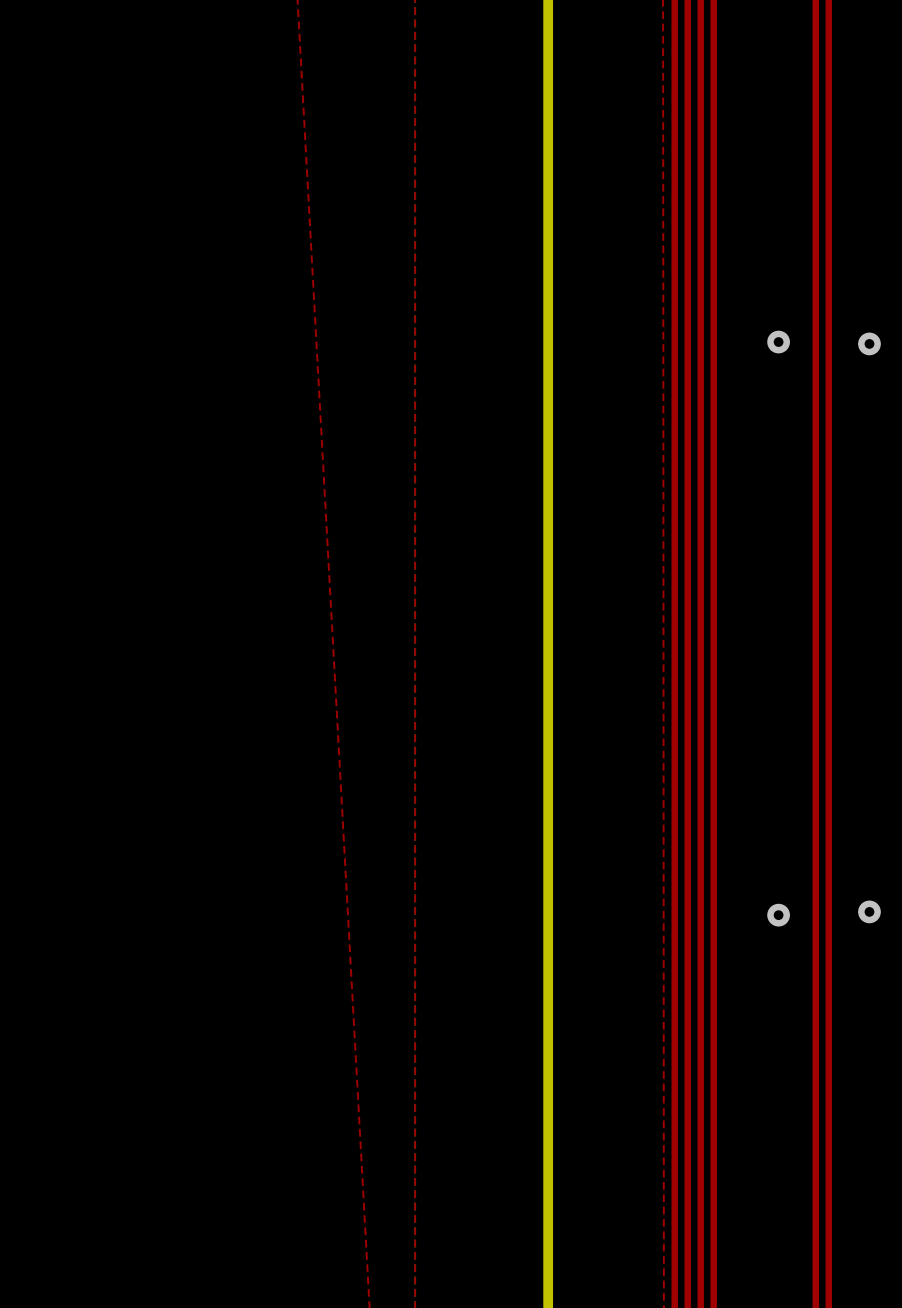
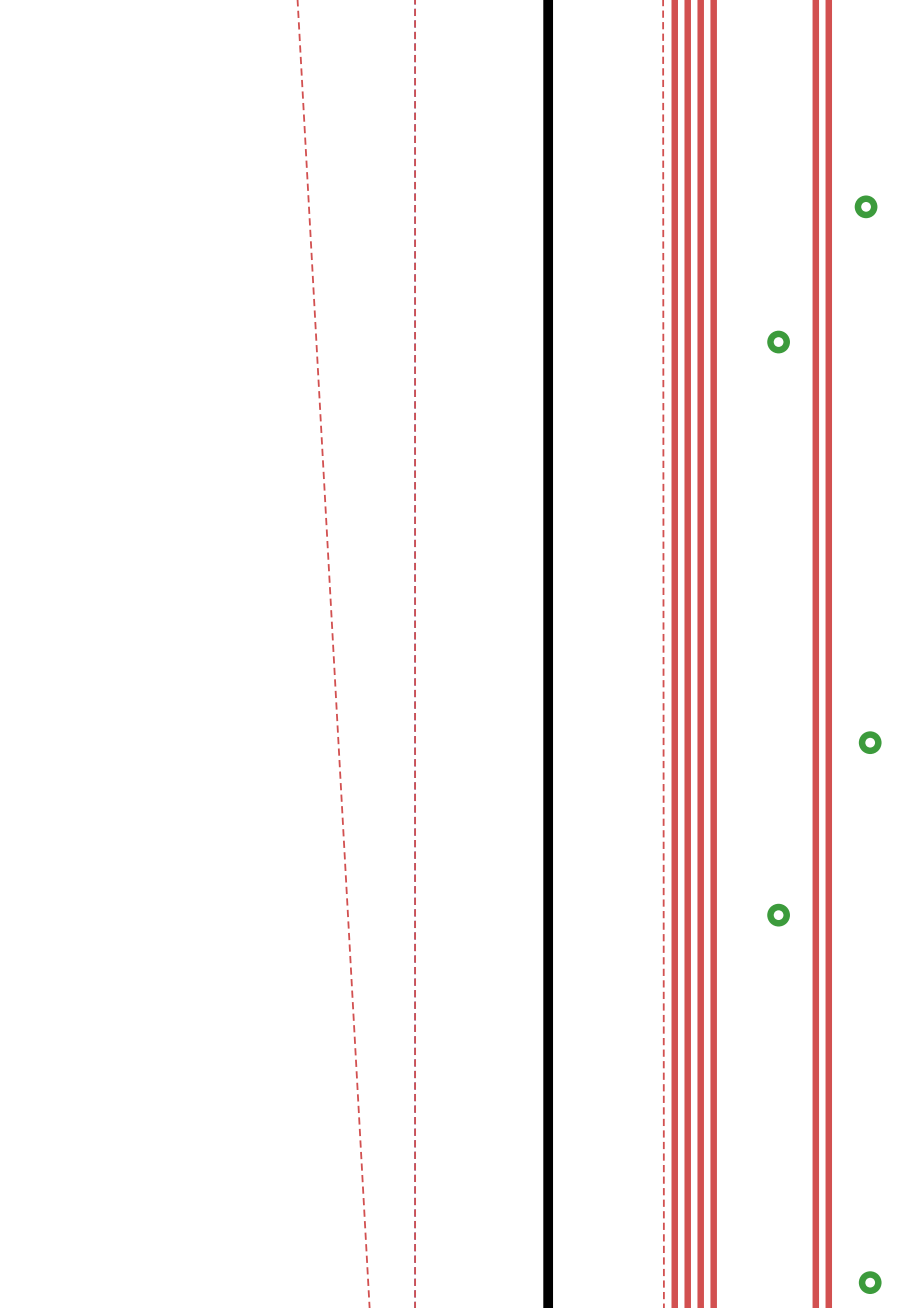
via: none -> (866, 206)
via: (869, 343) -> none
via: none -> (870, 742)
via: (869, 911) -> none
via: none -> (870, 1282)

